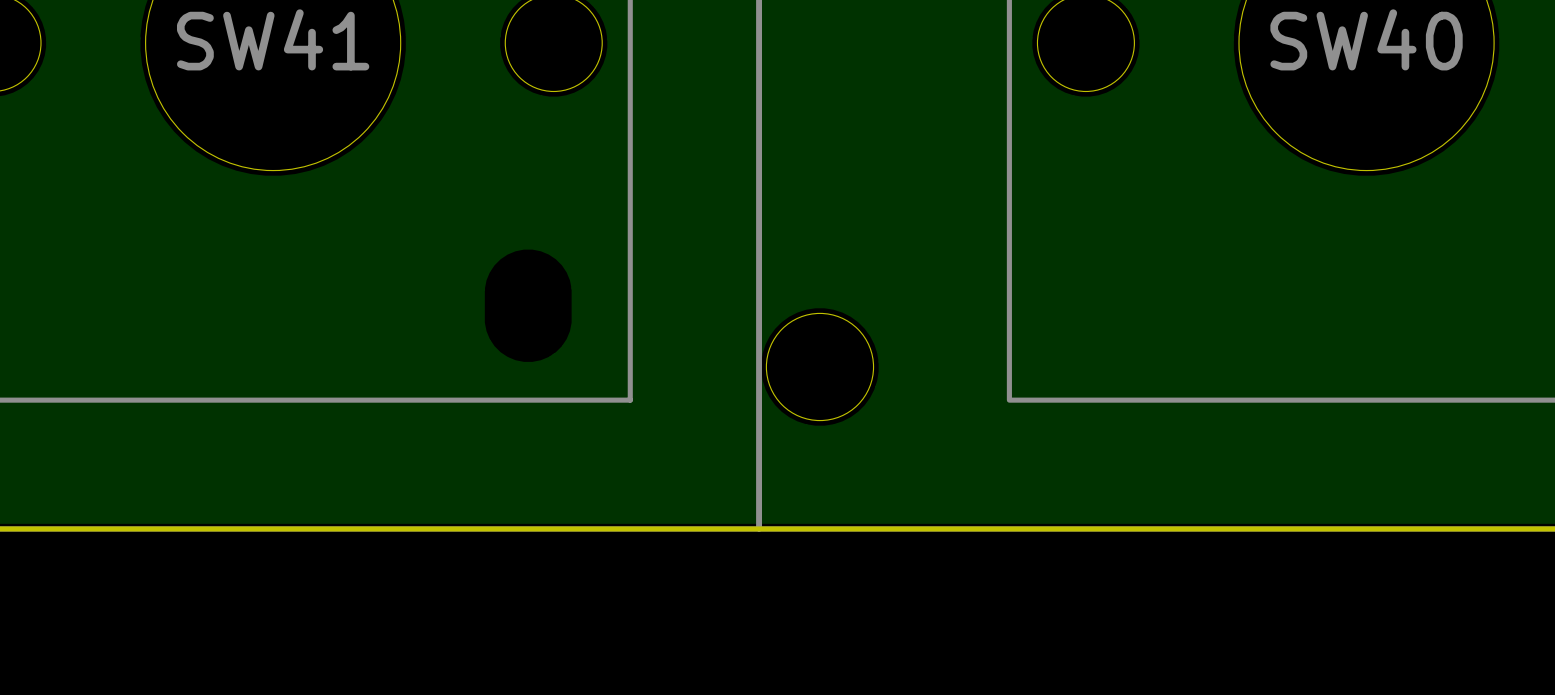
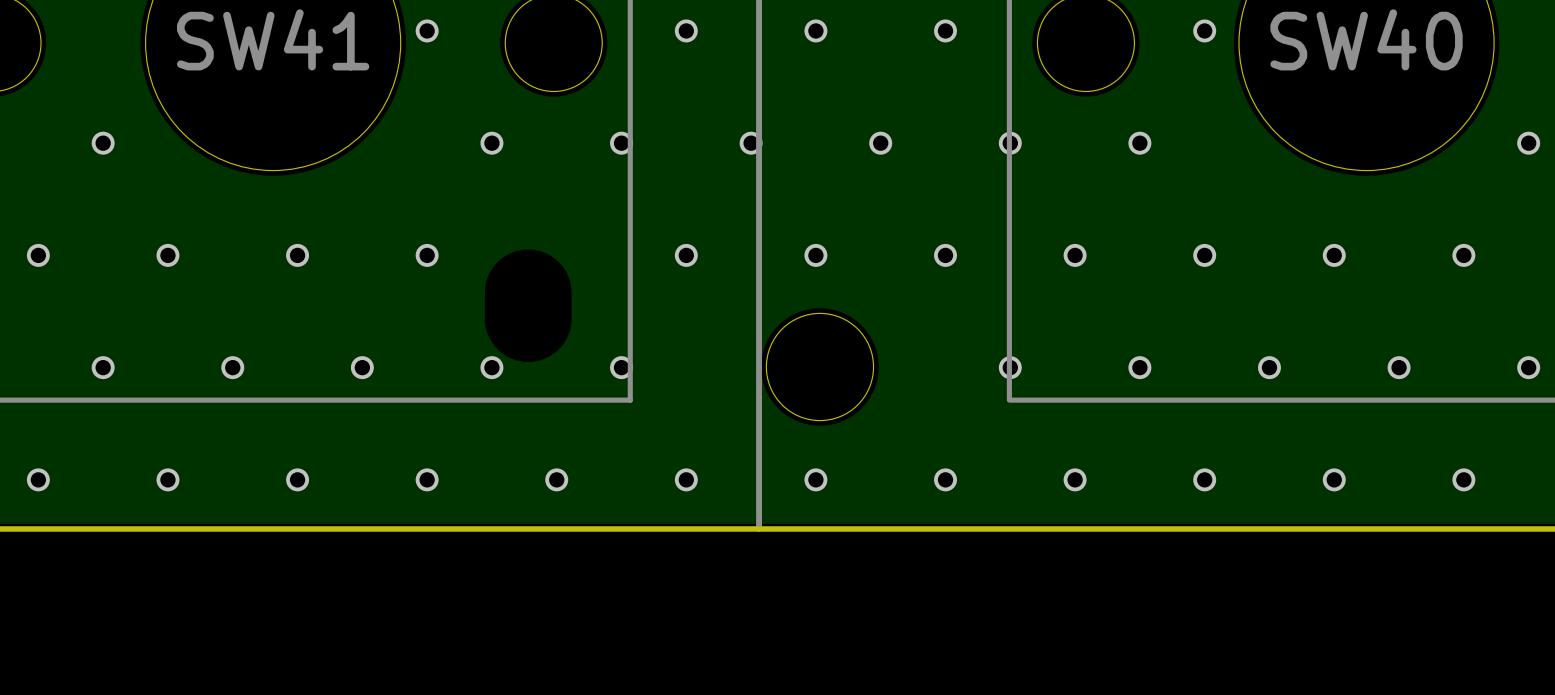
via: none -> (427, 30)
via: none -> (686, 30)
via: none -> (815, 30)
via: none -> (945, 30)
via: none -> (1204, 30)
via: none -> (103, 143)
via: none -> (491, 143)
via: none -> (621, 143)
via: none -> (751, 143)
via: none -> (880, 143)
via: none -> (1010, 143)
via: none -> (1139, 143)
via: none -> (1528, 143)
via: none -> (38, 255)
via: none -> (167, 255)
via: none -> (297, 255)
via: none -> (427, 255)
via: none -> (686, 255)
via: none -> (815, 255)
via: none -> (945, 255)
via: none -> (1075, 255)
via: none -> (1204, 255)
via: none -> (1334, 255)
via: none -> (1463, 255)
via: none -> (103, 367)
via: none -> (232, 367)
via: none -> (362, 367)
via: none -> (491, 367)
via: none -> (621, 367)
via: none -> (1010, 367)
via: none -> (1139, 367)
via: none -> (1269, 367)
via: none -> (1399, 367)
via: none -> (1528, 367)
via: none -> (38, 479)
via: none -> (167, 479)
via: none -> (297, 479)
via: none -> (427, 479)
via: none -> (556, 479)
via: none -> (686, 479)
via: none -> (815, 479)
via: none -> (945, 479)
via: none -> (1075, 479)
via: none -> (1204, 479)
via: none -> (1334, 479)
via: none -> (1463, 479)

